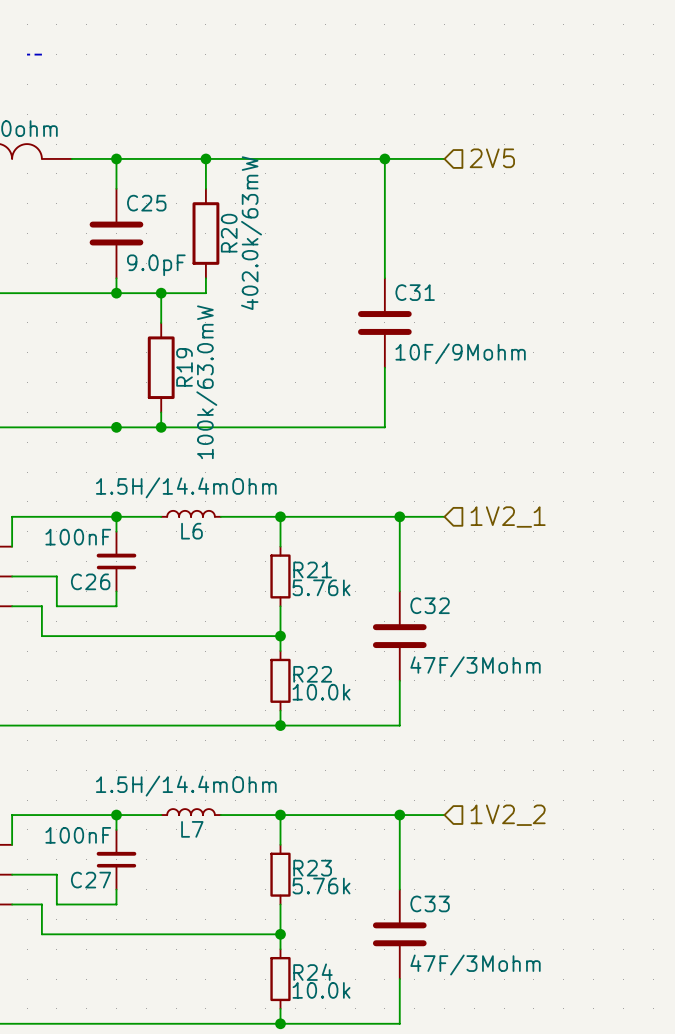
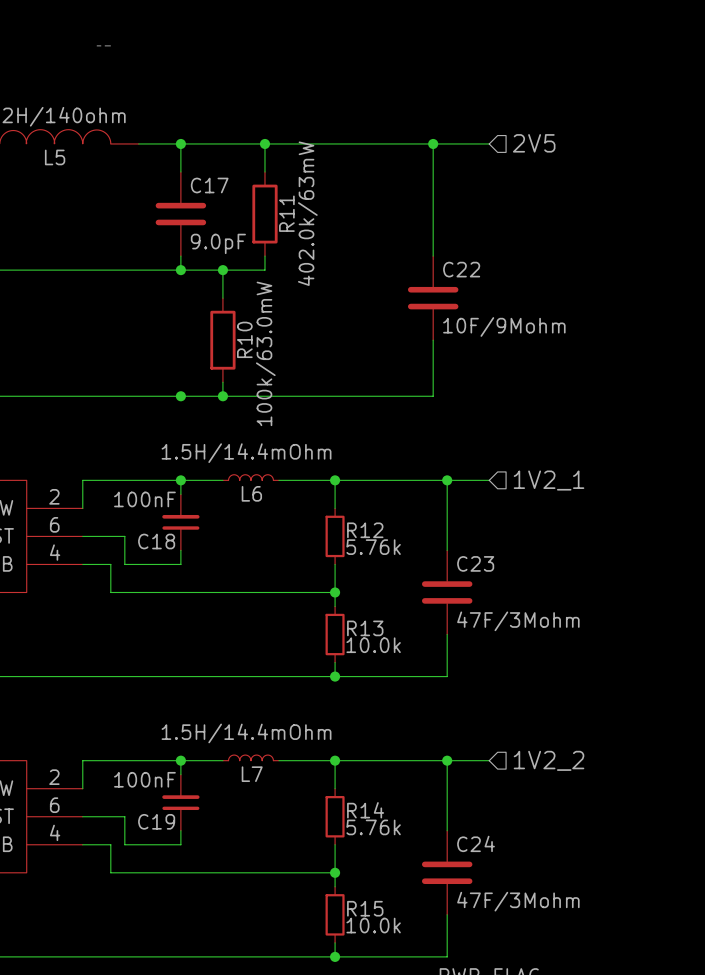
C25 name: C25 (146, 203) -> C17 (209, 185)
R20 name: R20 (229, 233) -> R11 (286, 213)
C31 name: C31 (415, 292) -> C22 (461, 269)
R19 name: R19 (184, 367) -> R10 (244, 339)
R21 name: R21 (312, 569) -> R12 (365, 530)
C26 name: C26 (90, 581) -> C18 (156, 541)
C32 name: C32 (430, 605) -> C23 (475, 563)
R22 name: R22 (312, 674) -> R13 (365, 628)
R23 name: R23 (312, 868) -> R14 (365, 810)
C27 name: C27 (91, 880) -> C19 (156, 821)
C33 name: C33 (430, 903) -> C24 (476, 843)
R24 name: R24 (312, 972) -> R15 (365, 908)

